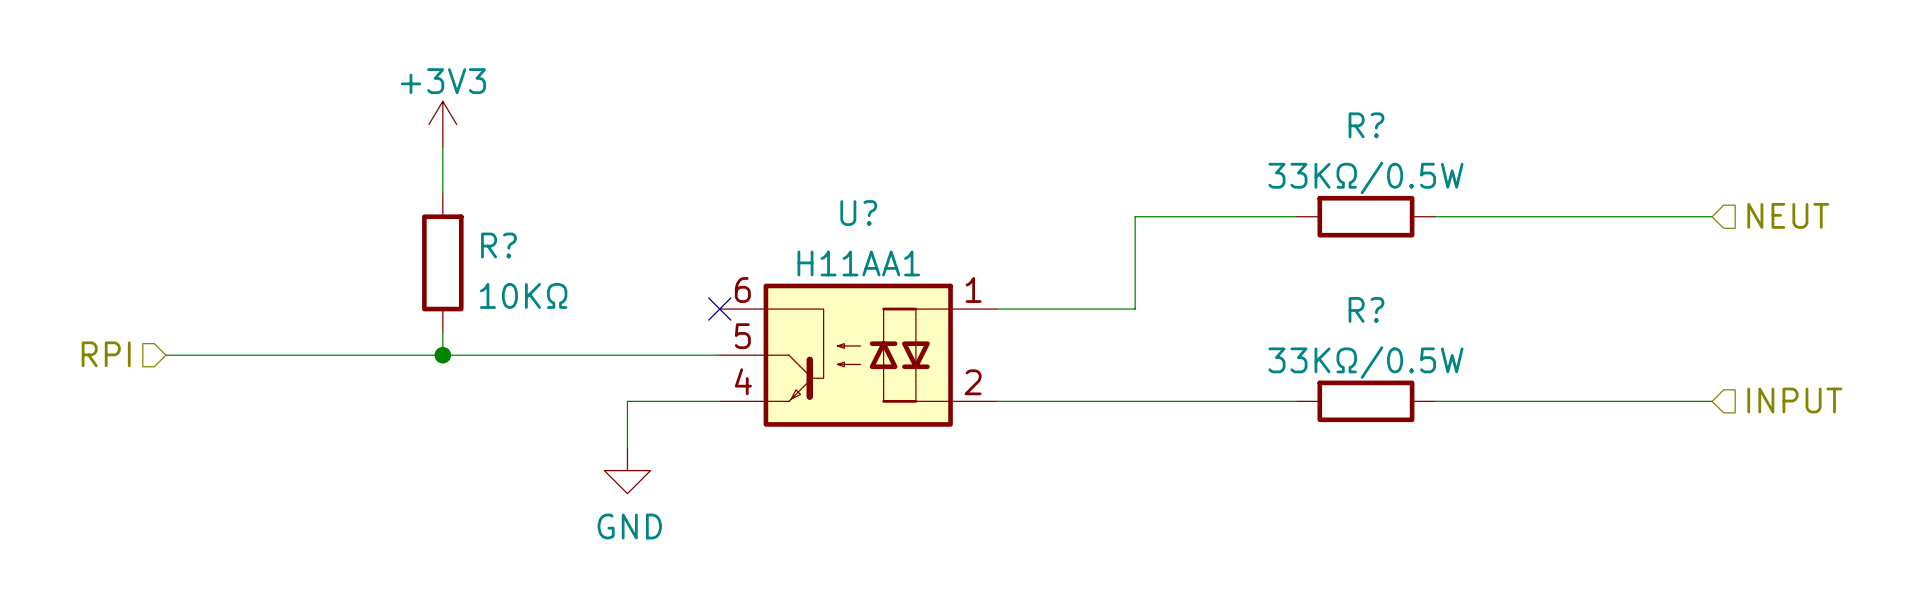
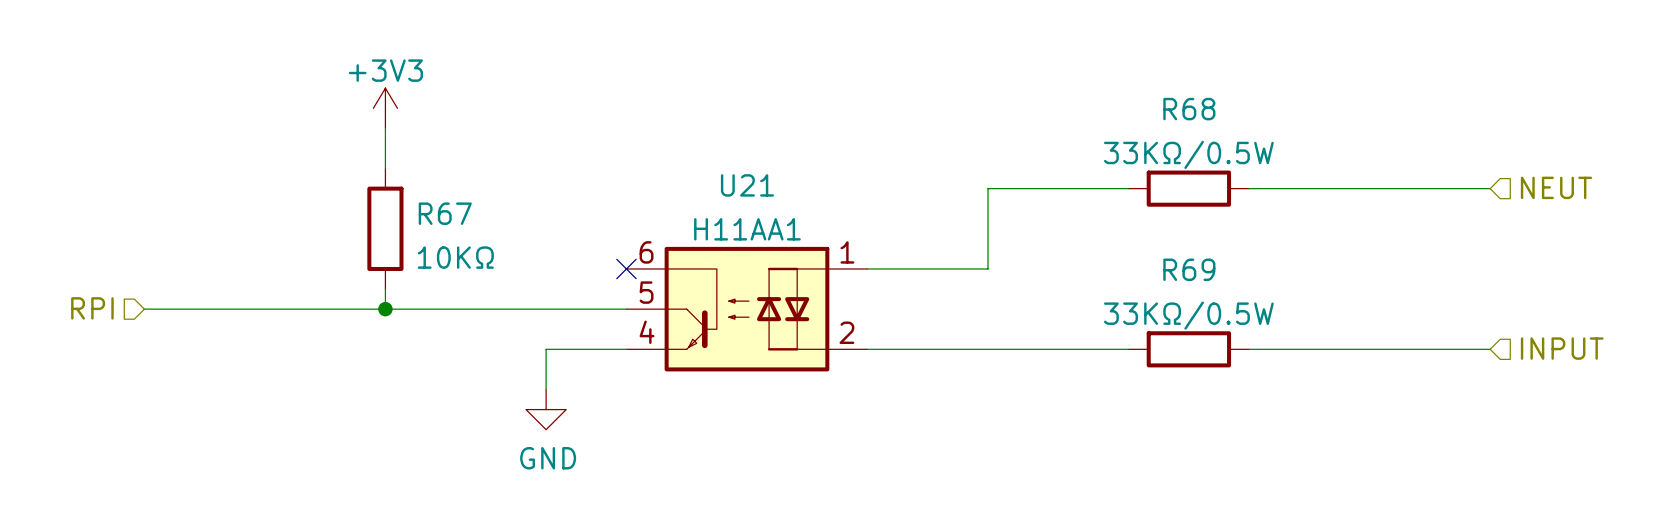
R? name: R? (1366, 125) -> R68 (1189, 109)
U? name: U? (858, 213) -> U21 (747, 185)
R? name: R? (498, 245) -> R67 (445, 213)
R? name: R? (1366, 309) -> R69 (1189, 269)

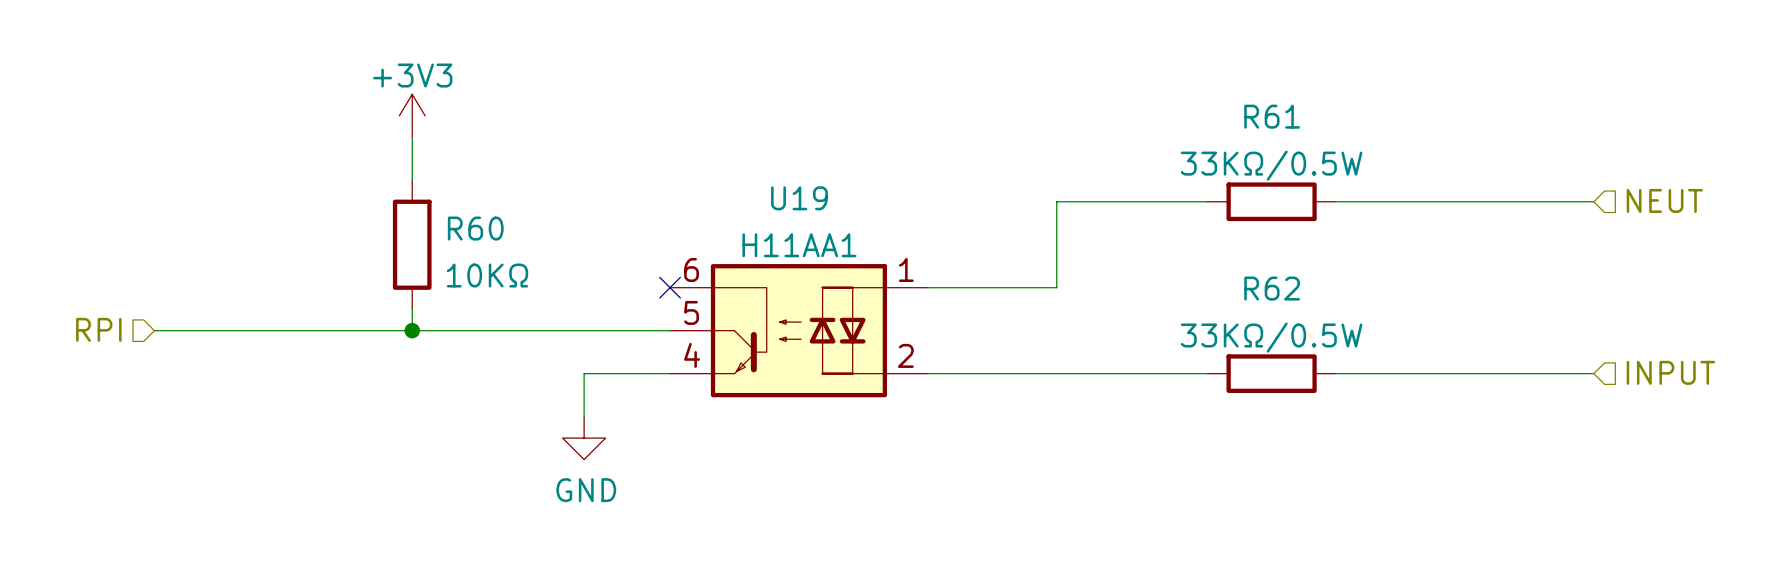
R68 name: R68 (1189, 109) -> R61 (1272, 116)
U21 name: U21 (747, 185) -> U19 (799, 198)
R67 name: R67 (445, 213) -> R60 (475, 228)
R69 name: R69 (1189, 269) -> R62 (1272, 288)

